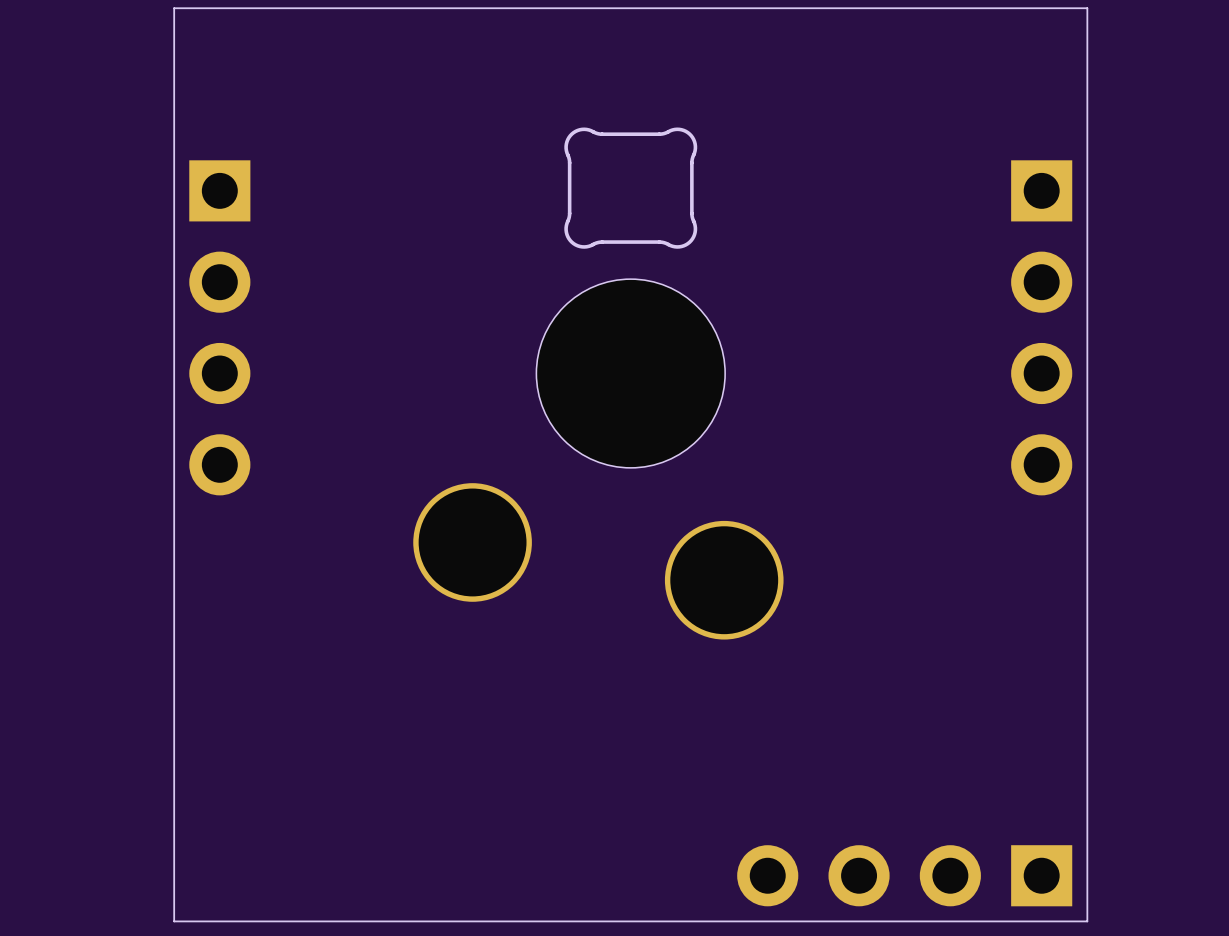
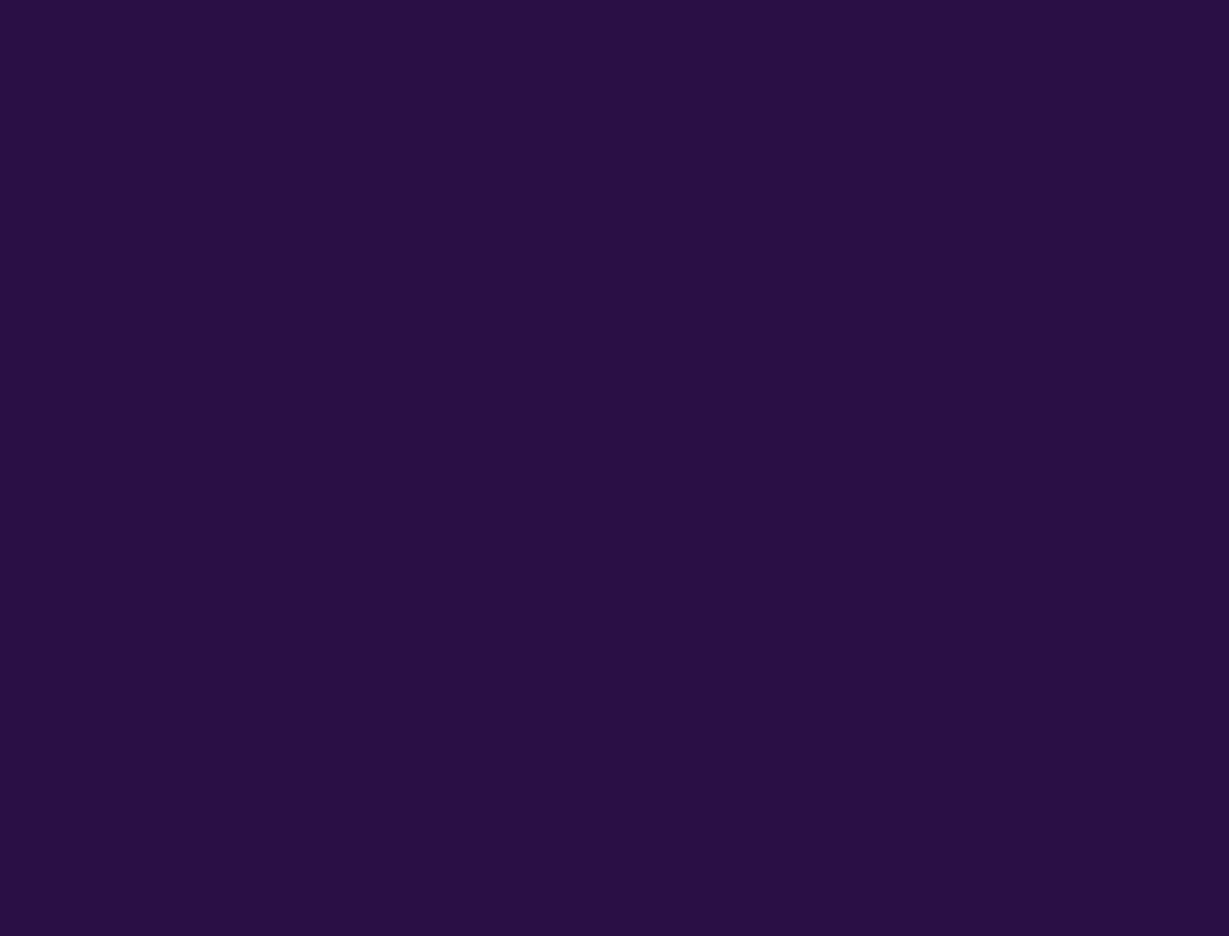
board edge: (1087, 8) (174, 8) (174, 921) (1087, 921) (1087, 8) -> none
part: (630, 188) -> none
part: (219, 327) -> none
part: (1041, 327) -> none
part: (598, 459) -> none
part: (904, 875) -> none

